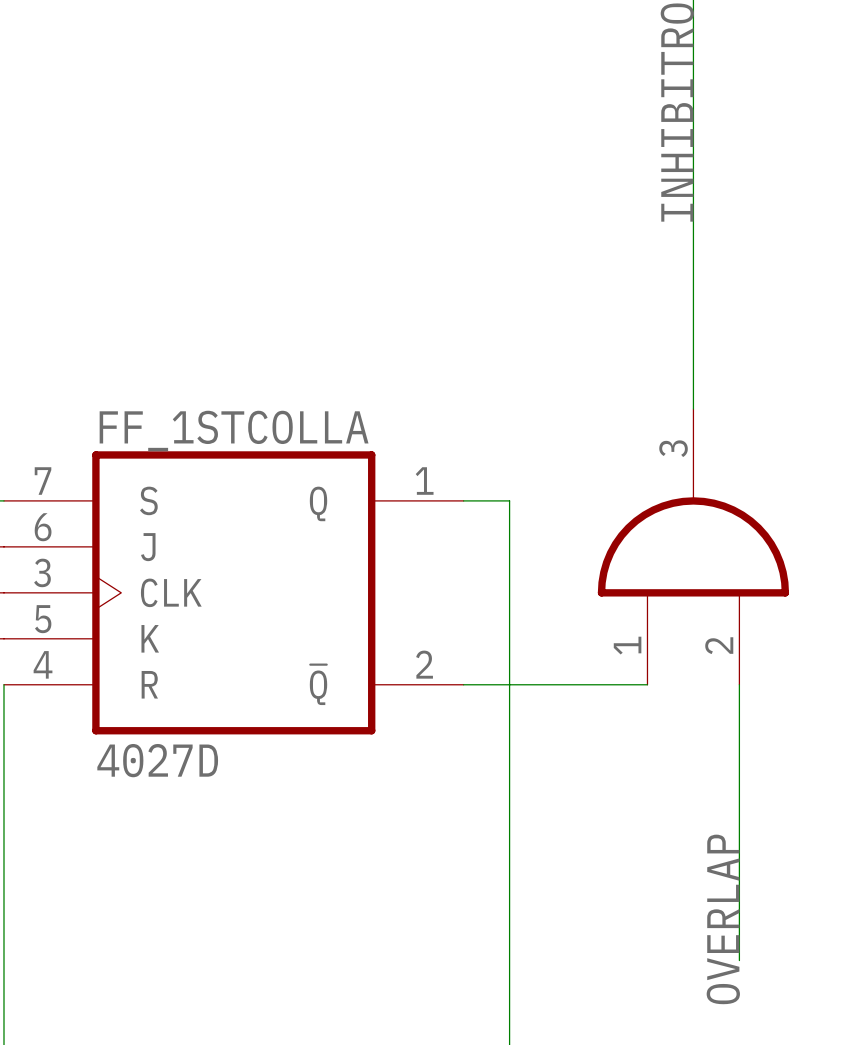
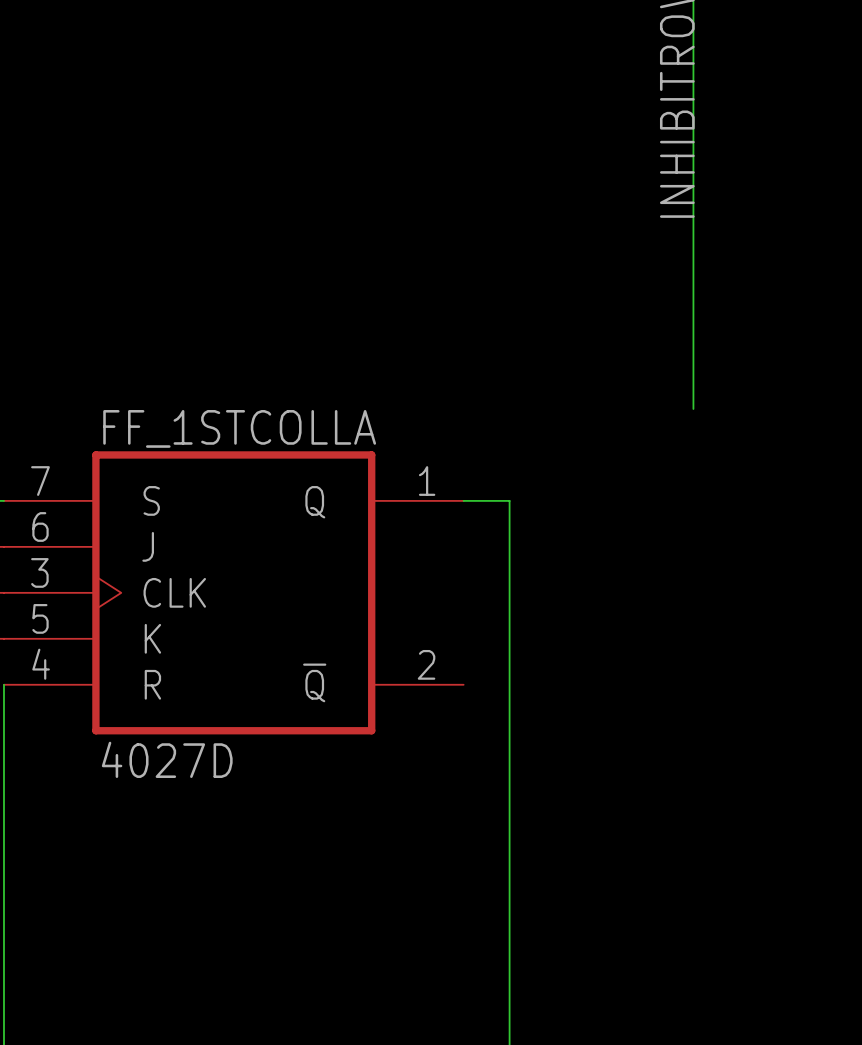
part: (693, 546) -> none
wire: (463, 684) (647, 684) -> none
wire: (739, 684) (739, 960) -> none
label: OVERLAP (723, 919) -> none

